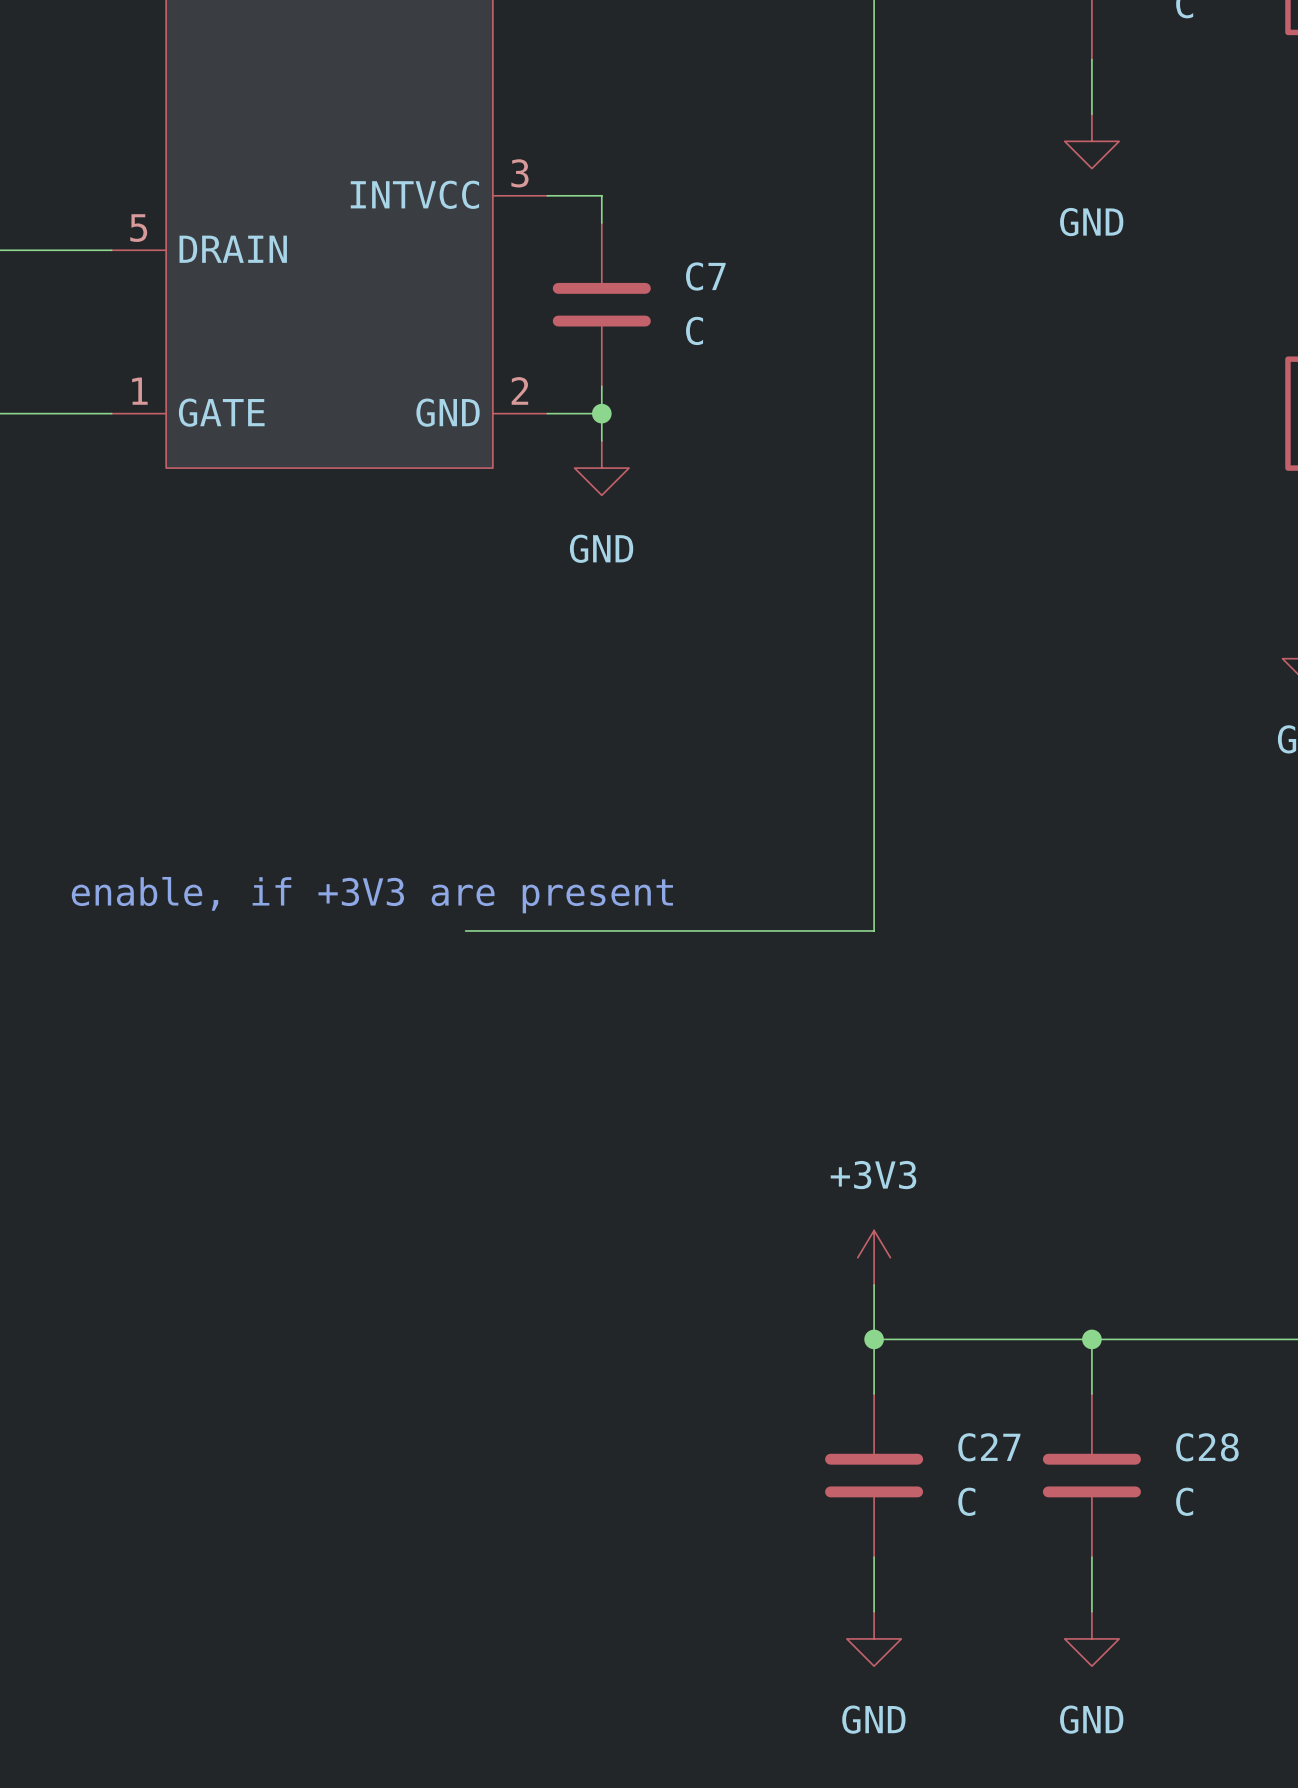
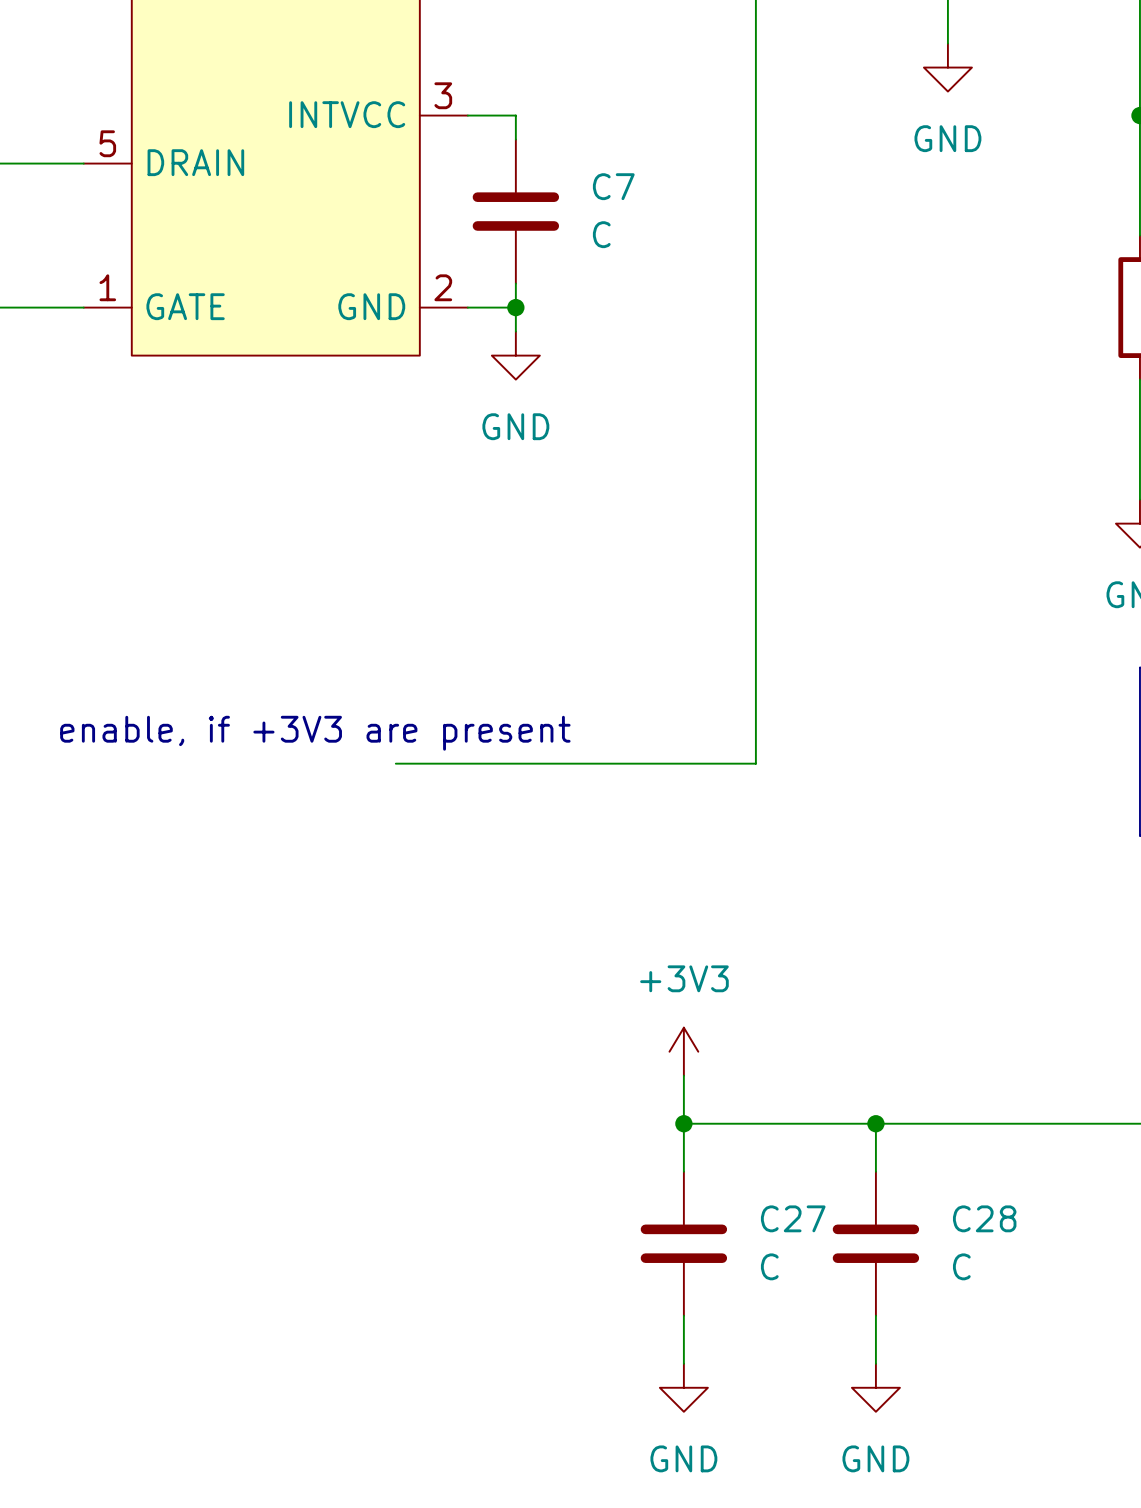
power symbol position: +3V3 (874, 1257) -> +3V3 (683, 1051)
wire: (874, 1284) (874, 1393) -> (683, 1075) (683, 1171)
wire: none -> (683, 1123) (755, 1123)
junction: none -> (683, 1123)
junction: (874, 1339) -> none
junction: none -> (875, 1123)
wire: (1091, 1339) (1091, 1393) -> (875, 1123) (875, 1171)
junction: (1091, 1339) -> none
C27 position: (874, 1475) -> (683, 1243)
C28 position: (1091, 1475) -> (875, 1243)
wire: (874, 1557) (874, 1611) -> (683, 1315) (683, 1363)
wire: (1091, 1557) (1091, 1611) -> (875, 1315) (875, 1363)
power symbol: none -> GND (683, 1387)
power symbol: GND (874, 1638) -> none
power symbol: none -> GND (875, 1387)
power symbol: GND (1091, 1638) -> none

